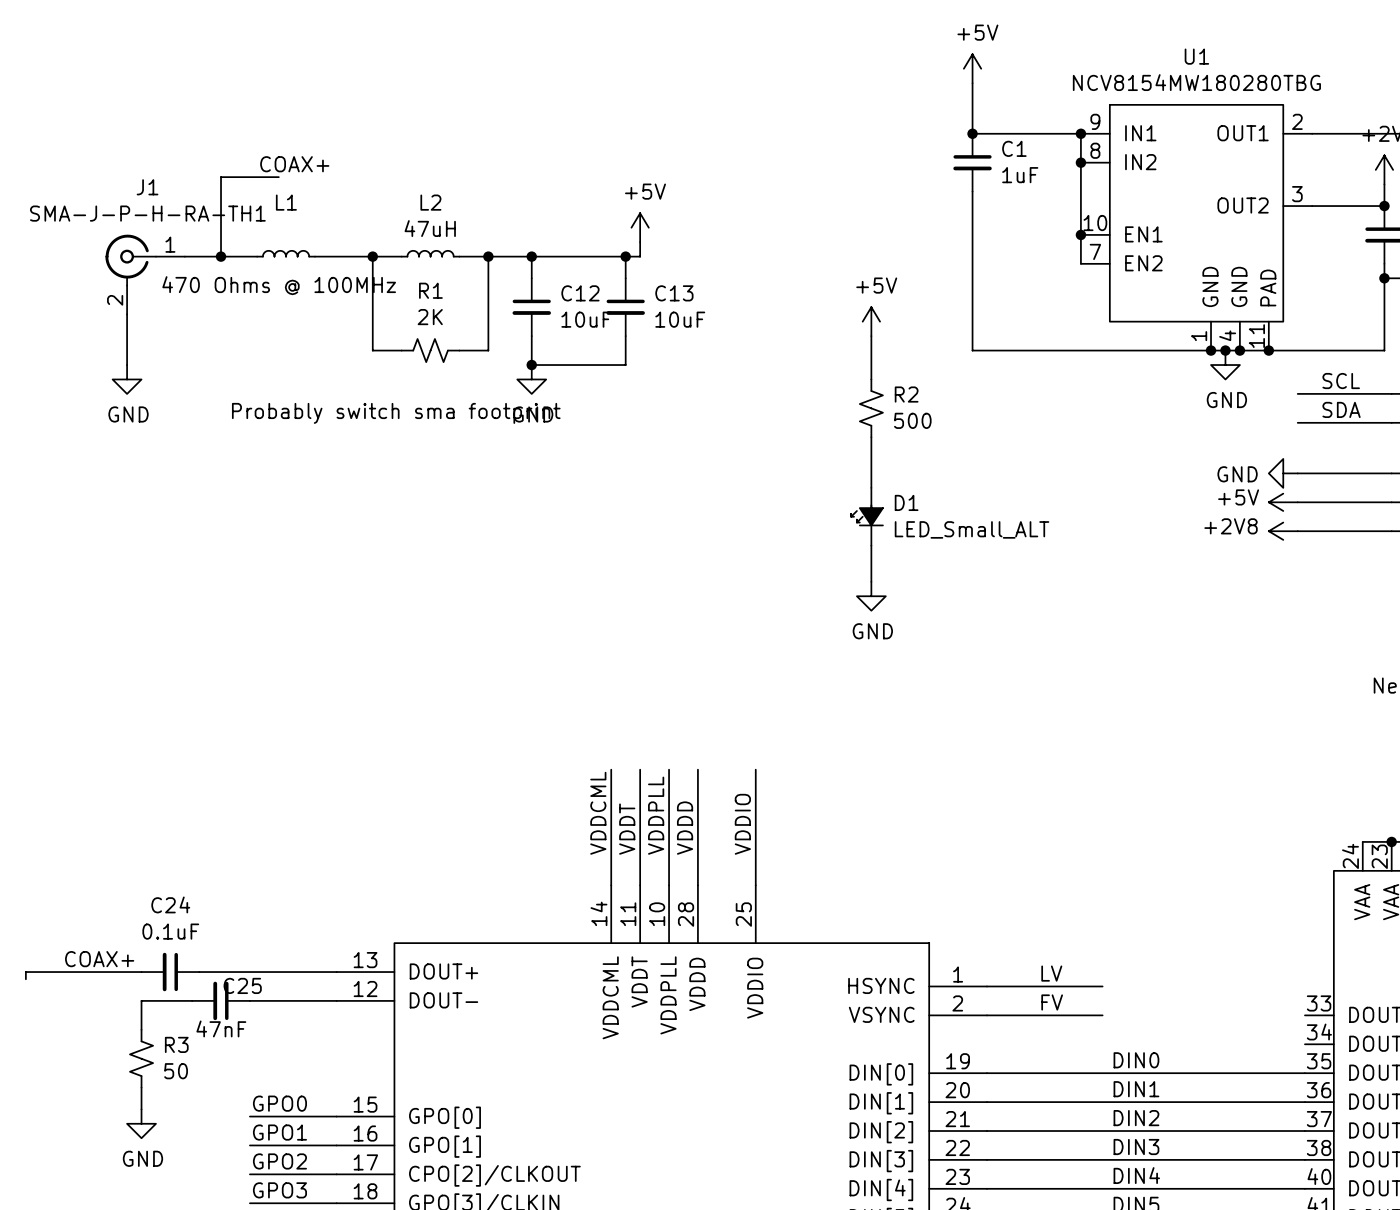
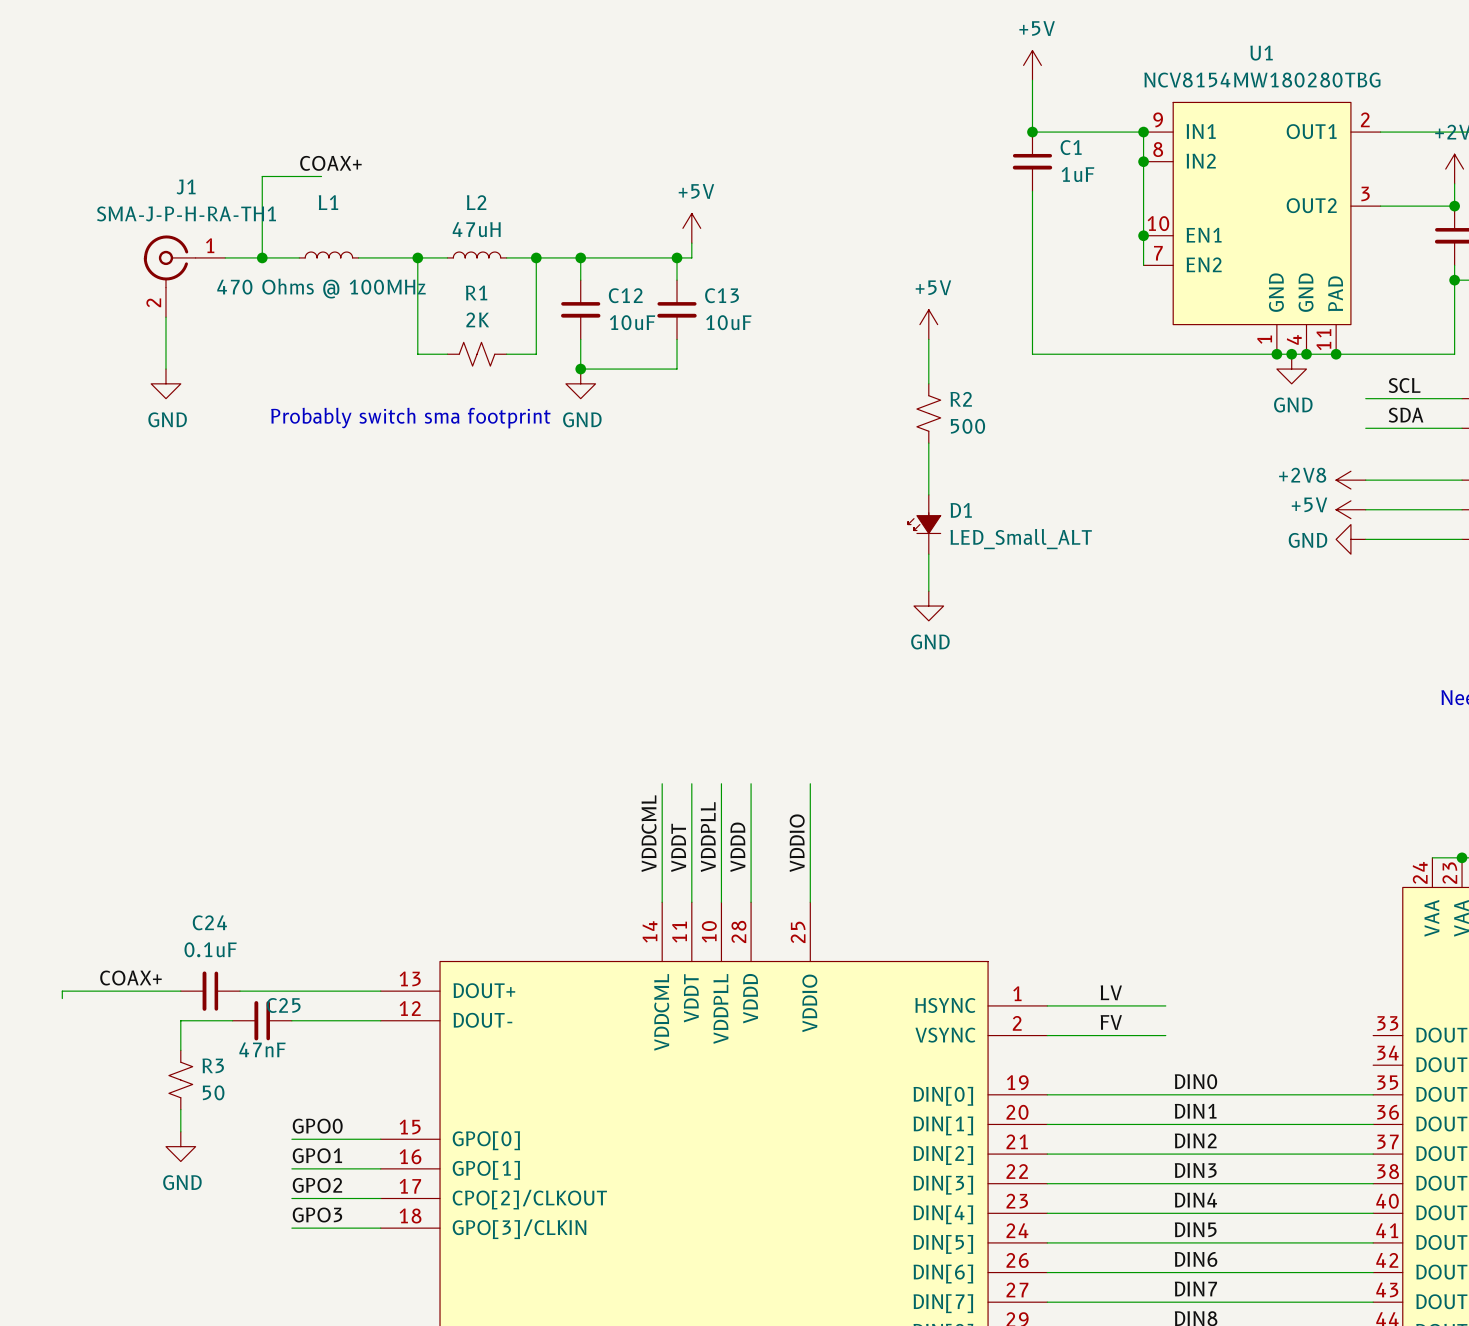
power symbol: GND (1283, 473) -> +2V8 (1350, 480)
power symbol: +2V8 (1283, 531) -> GND (1350, 539)

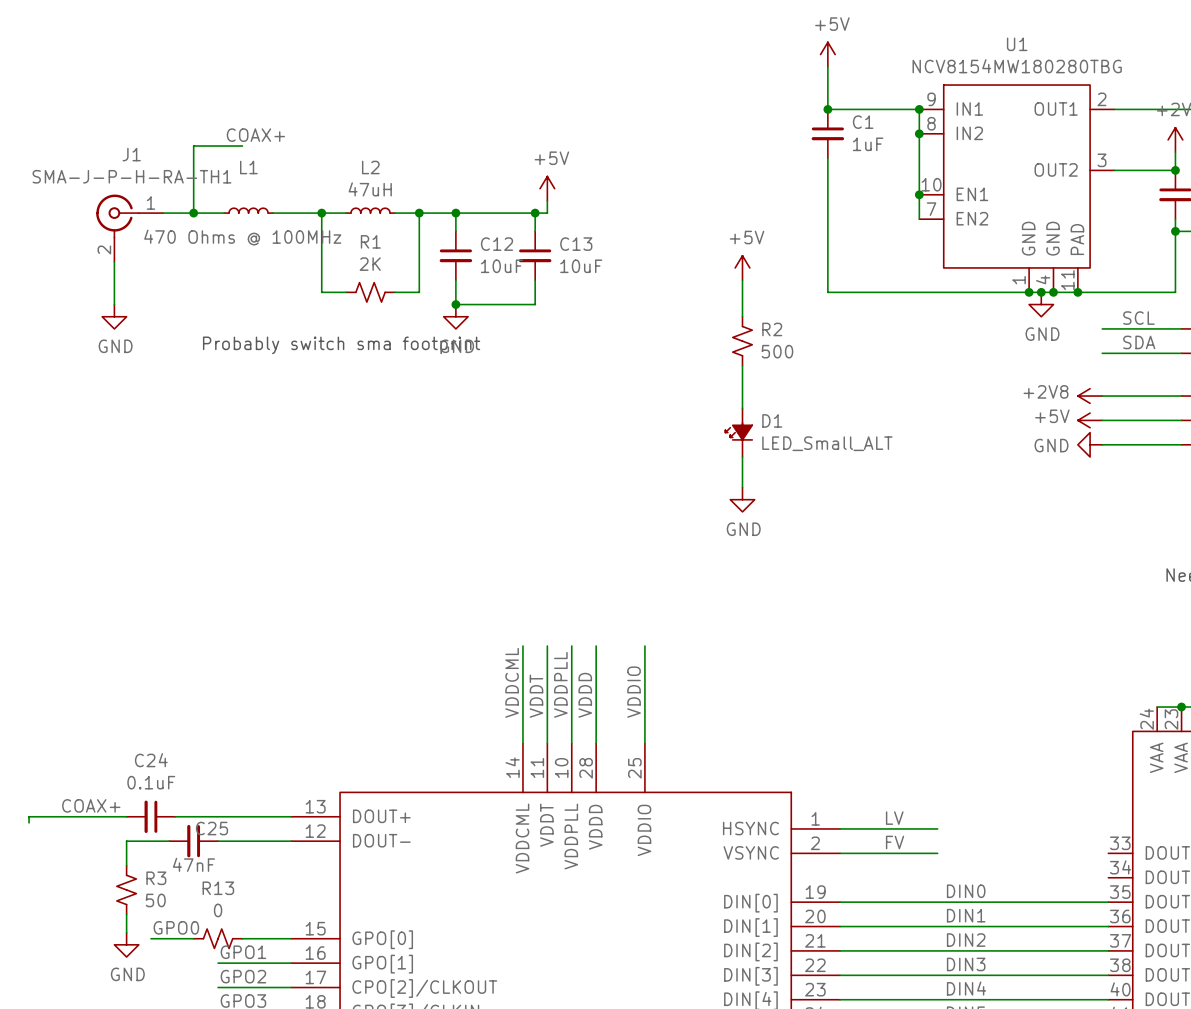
label position: GPO0 (317, 1126) -> GPO0 (176, 927)
wire: none -> (150, 938) (193, 938)
wire: (291, 1139) (321, 1139) -> none
R13: none -> 0 (218, 938)

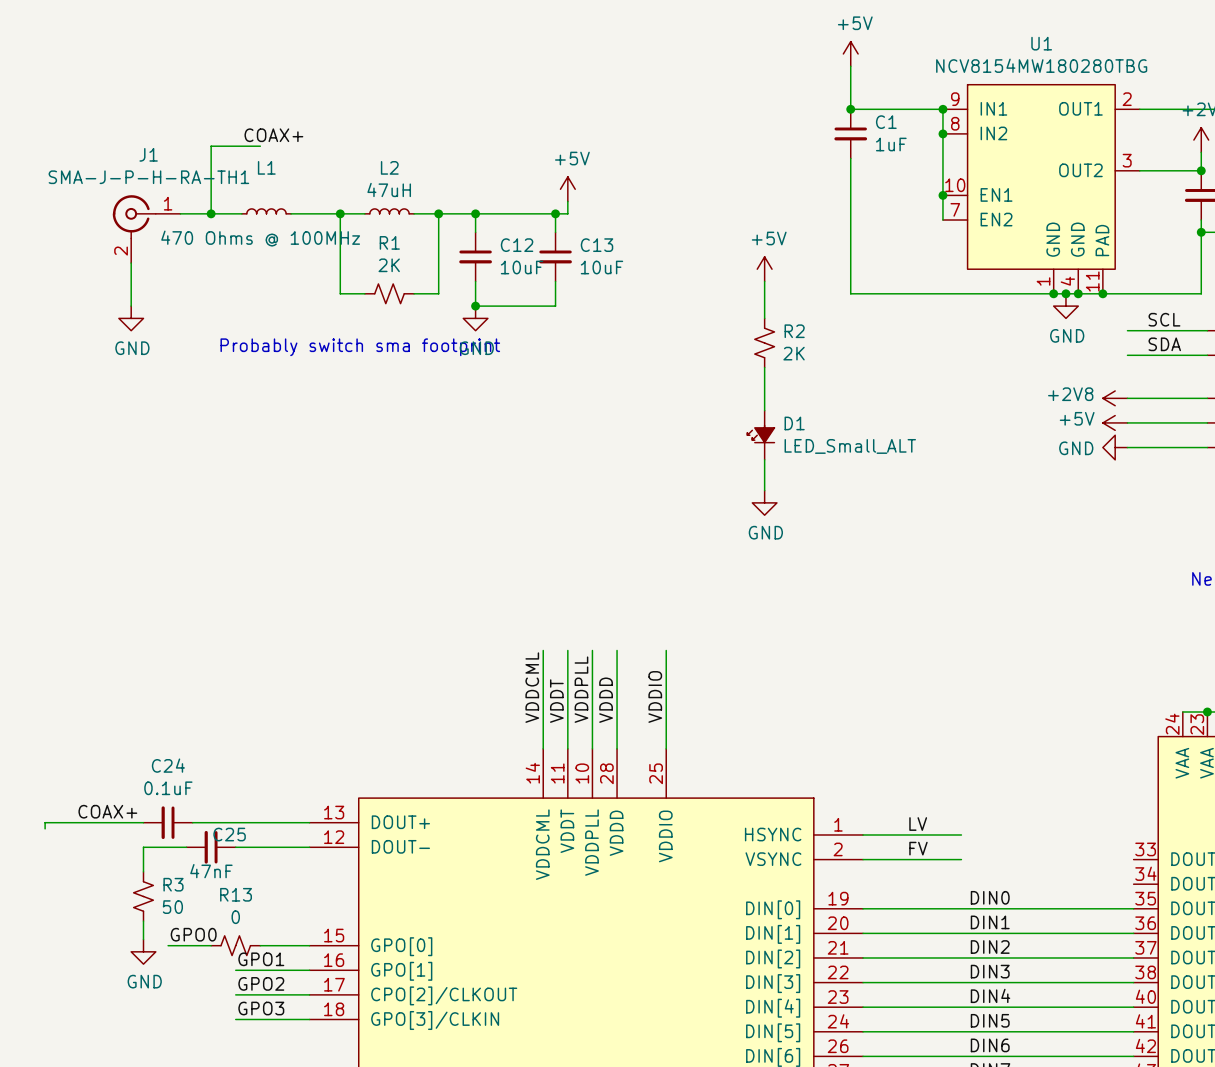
R2 value: 500 (777, 351) -> 2K (794, 353)

